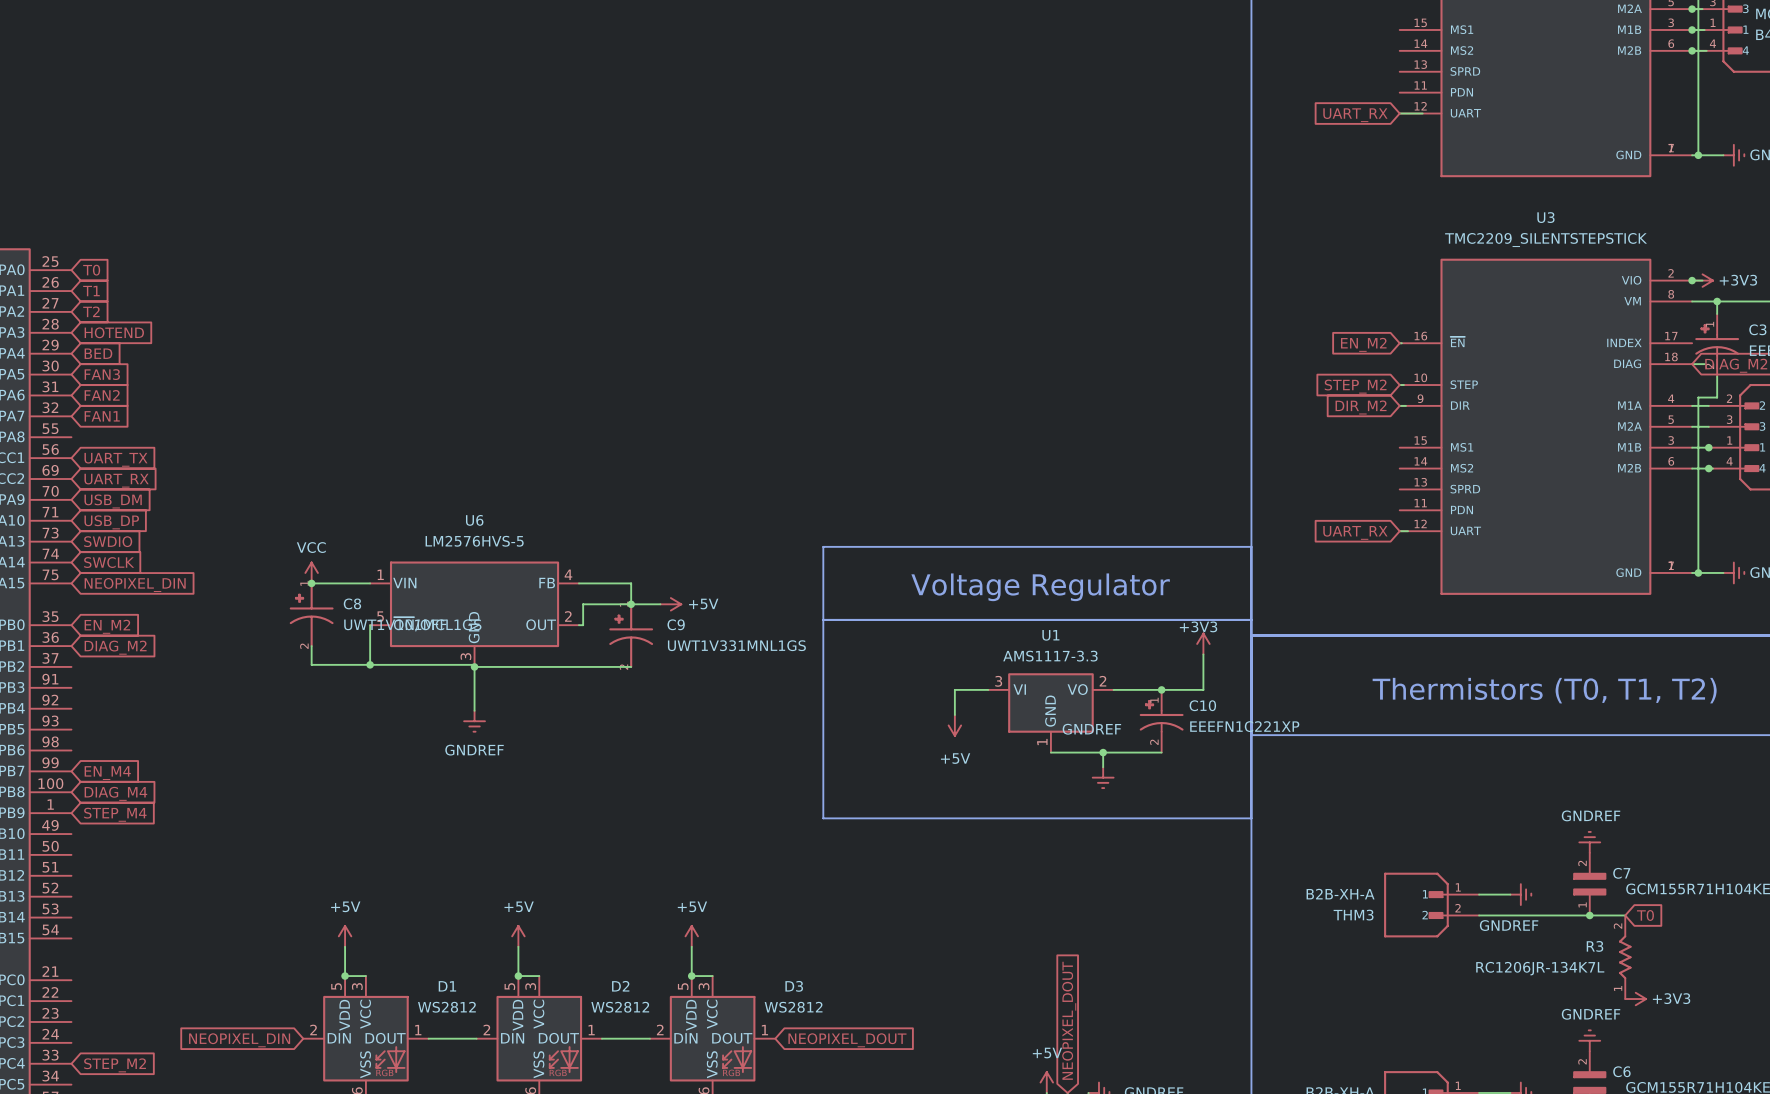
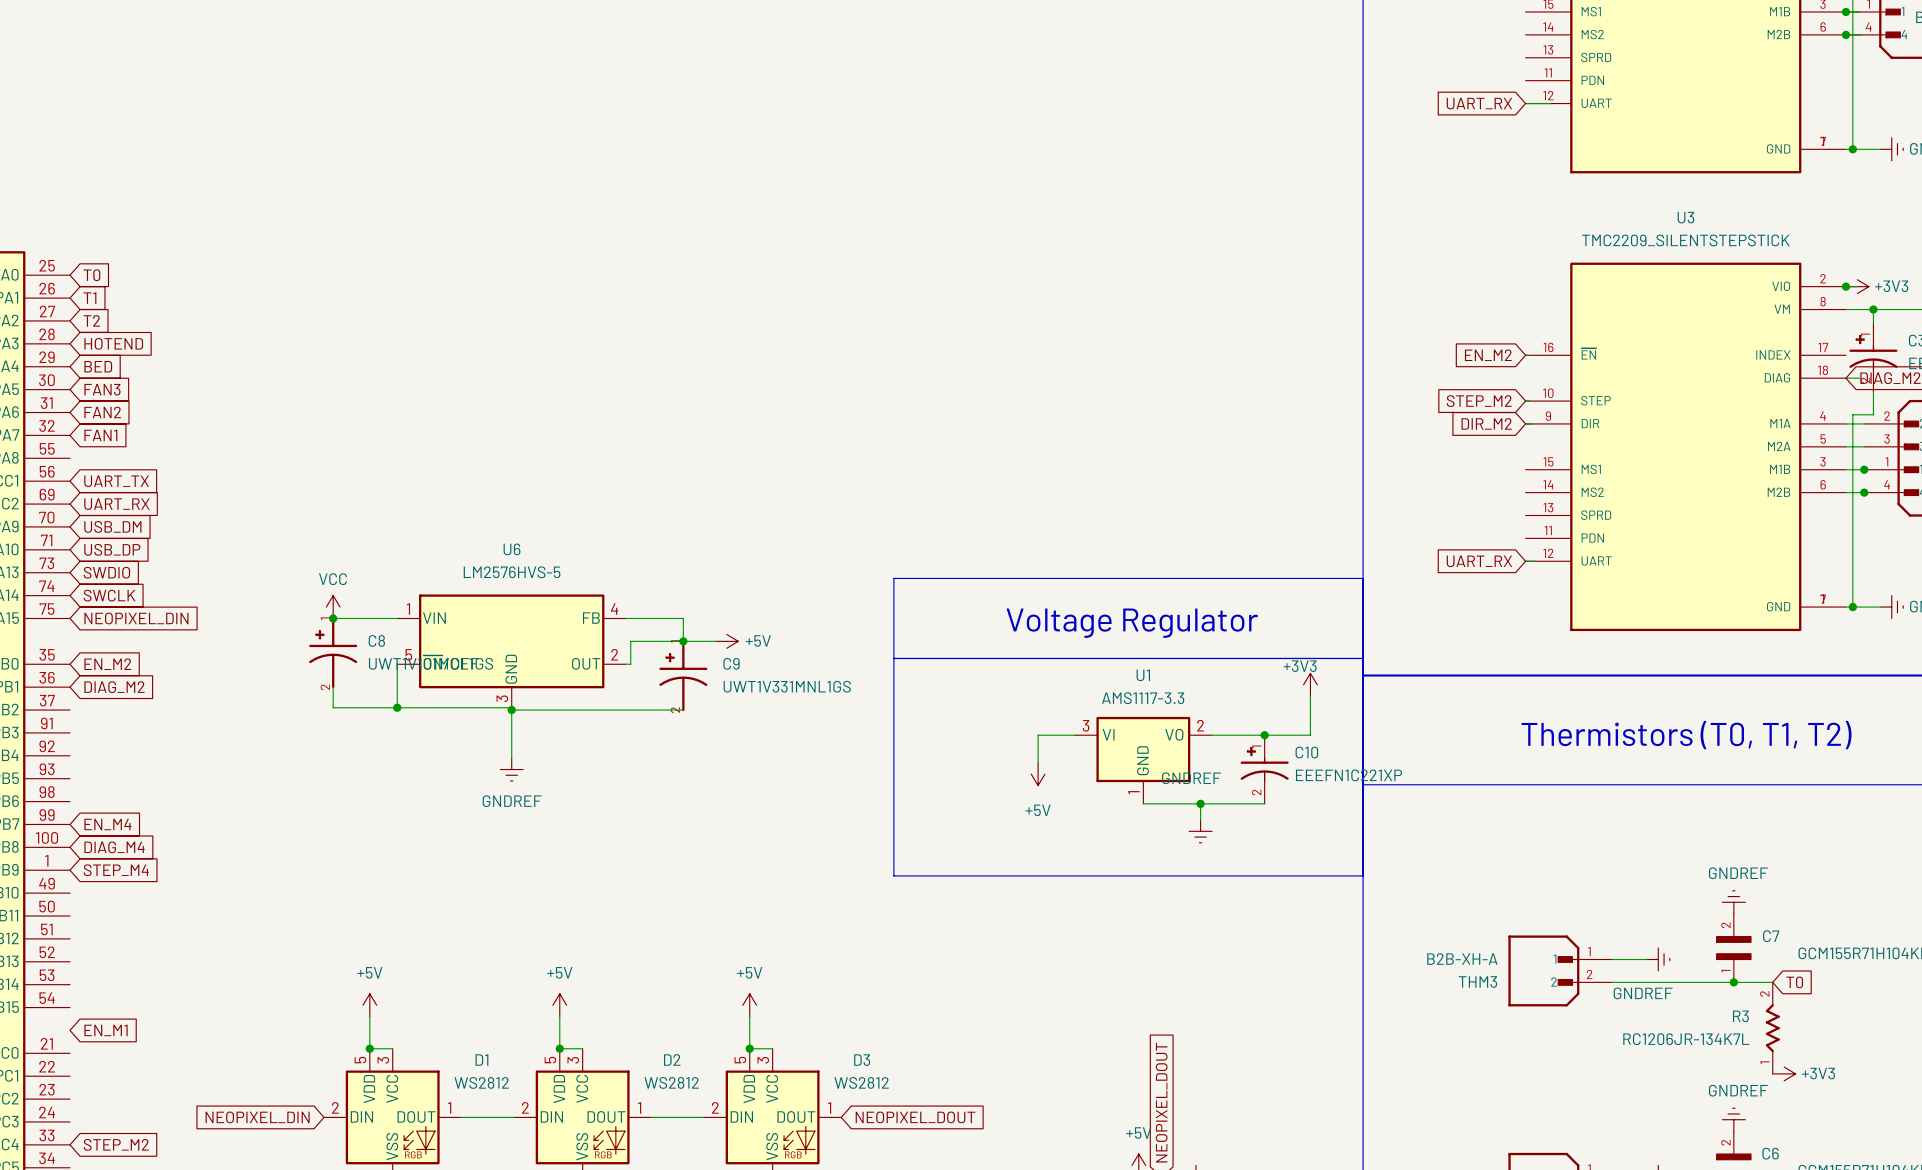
global label: none -> EN_M1 (106, 1030)

